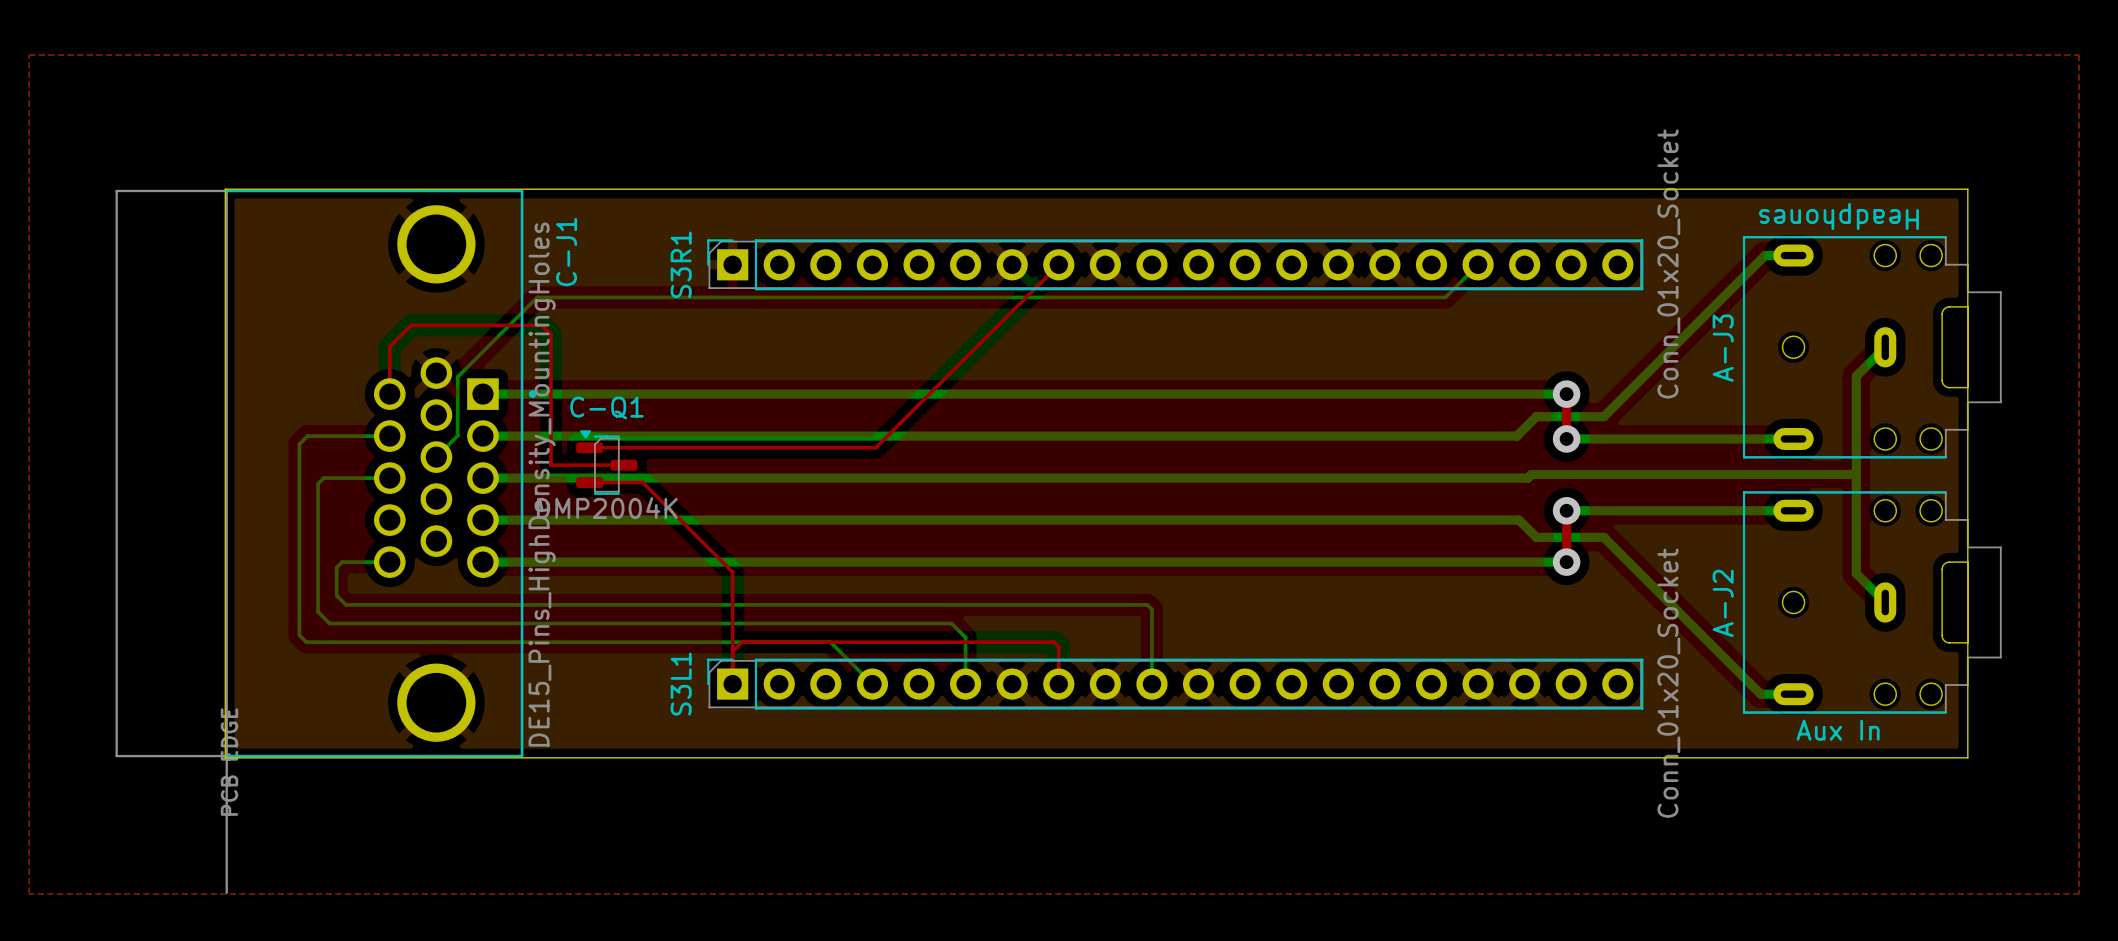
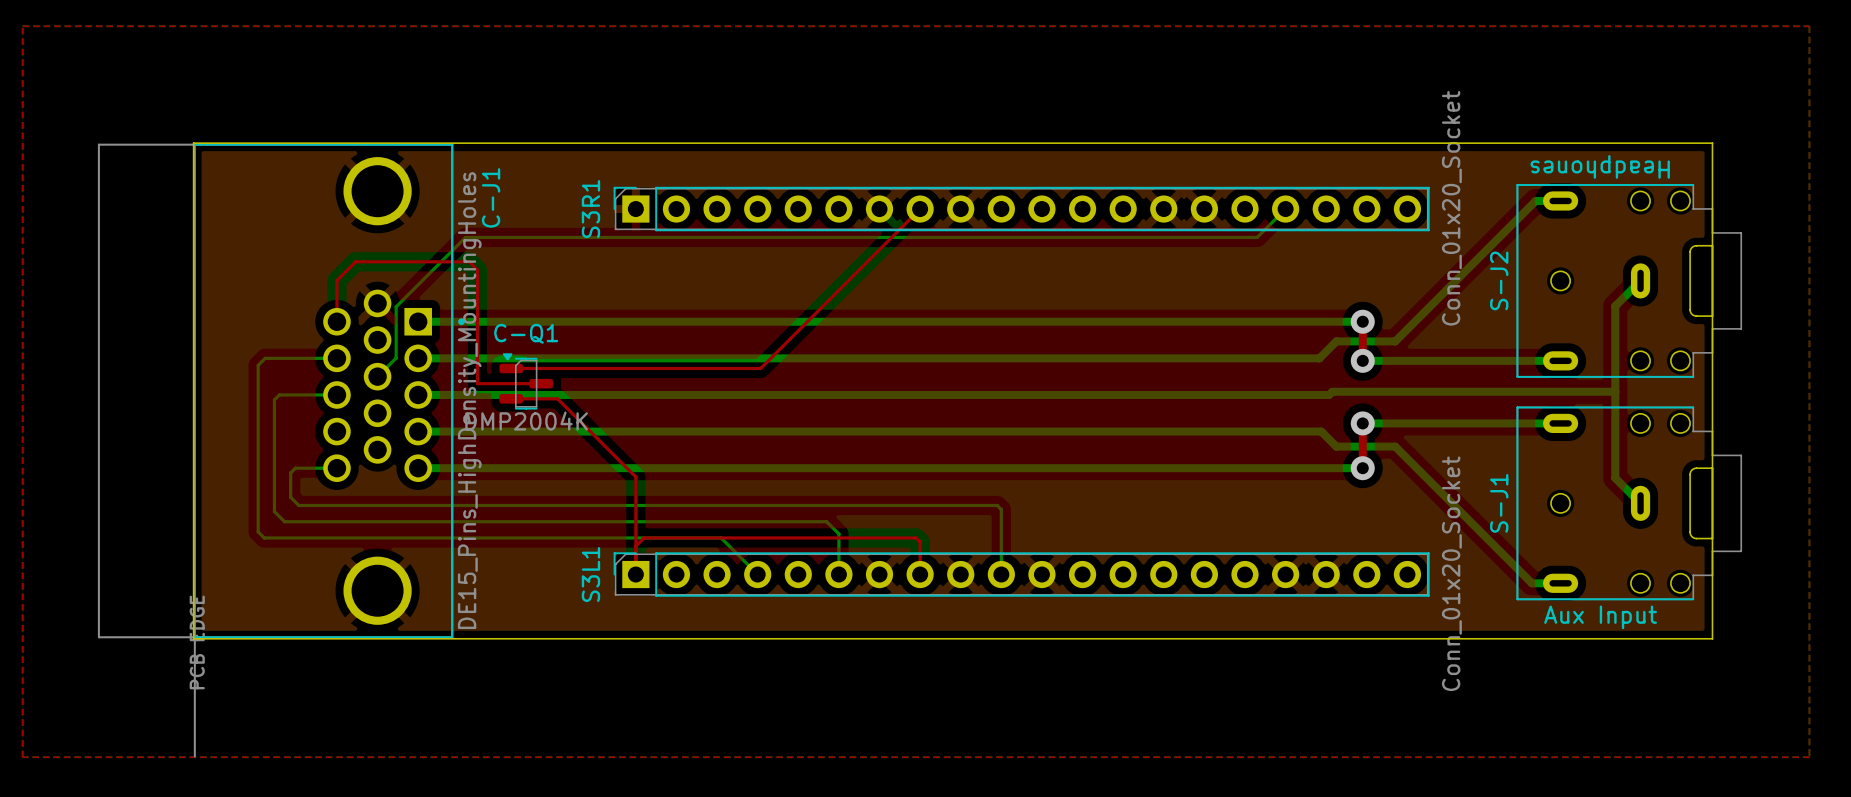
A-J3 name: A-J3 (1723, 348) -> S-J2 (1499, 280)
A-J2 name: A-J2 (1723, 603) -> S-J1 (1499, 503)
A-J2 value: Aux In (1838, 730) -> Aux Input (1600, 617)

